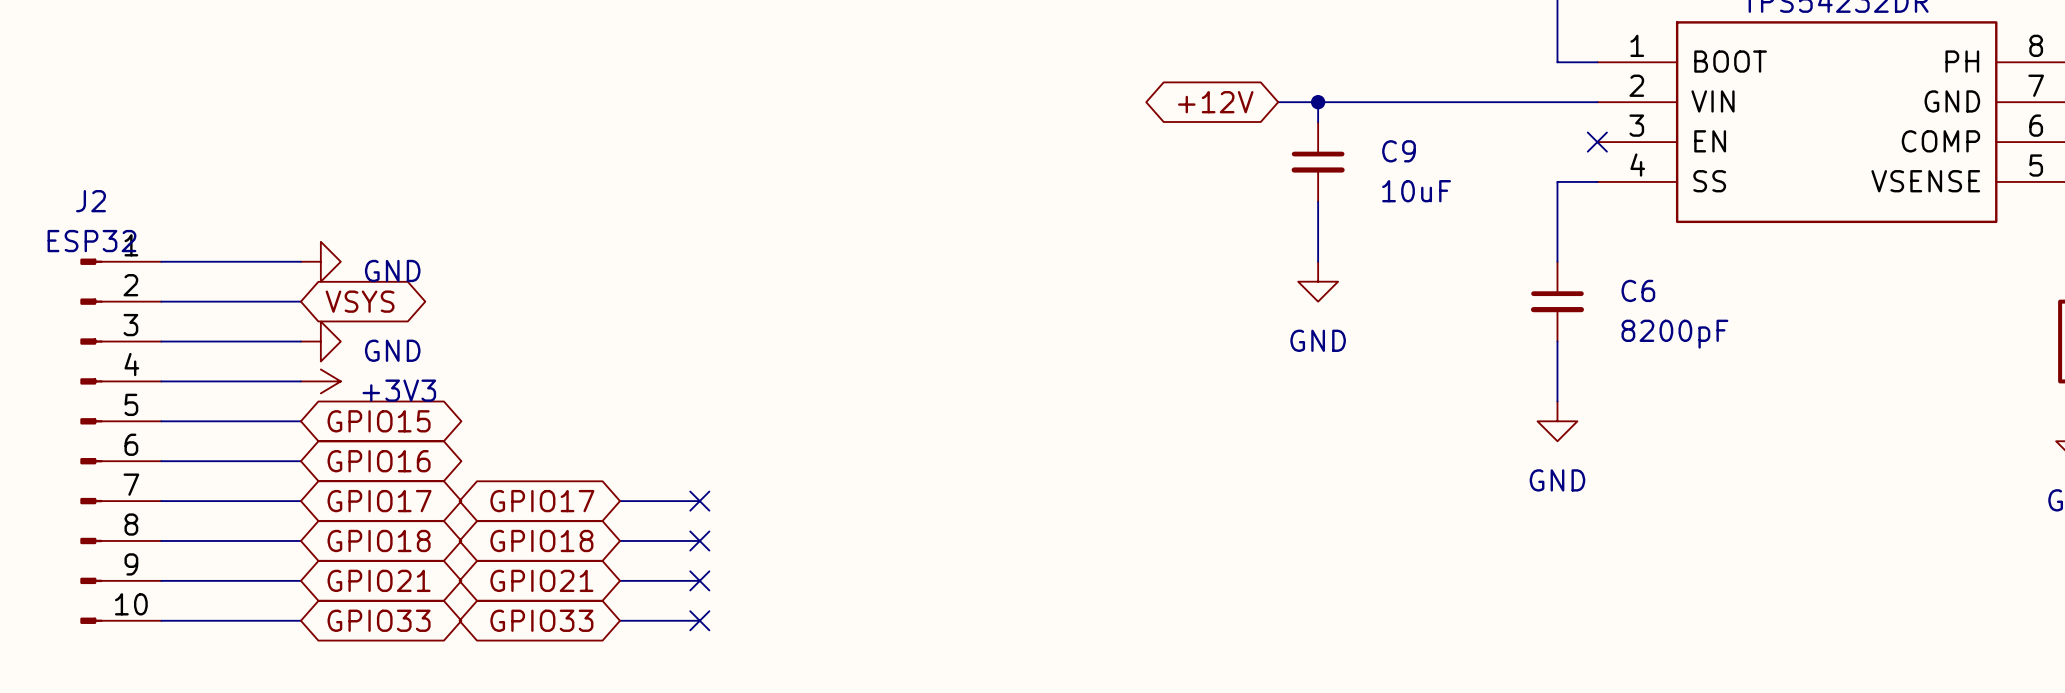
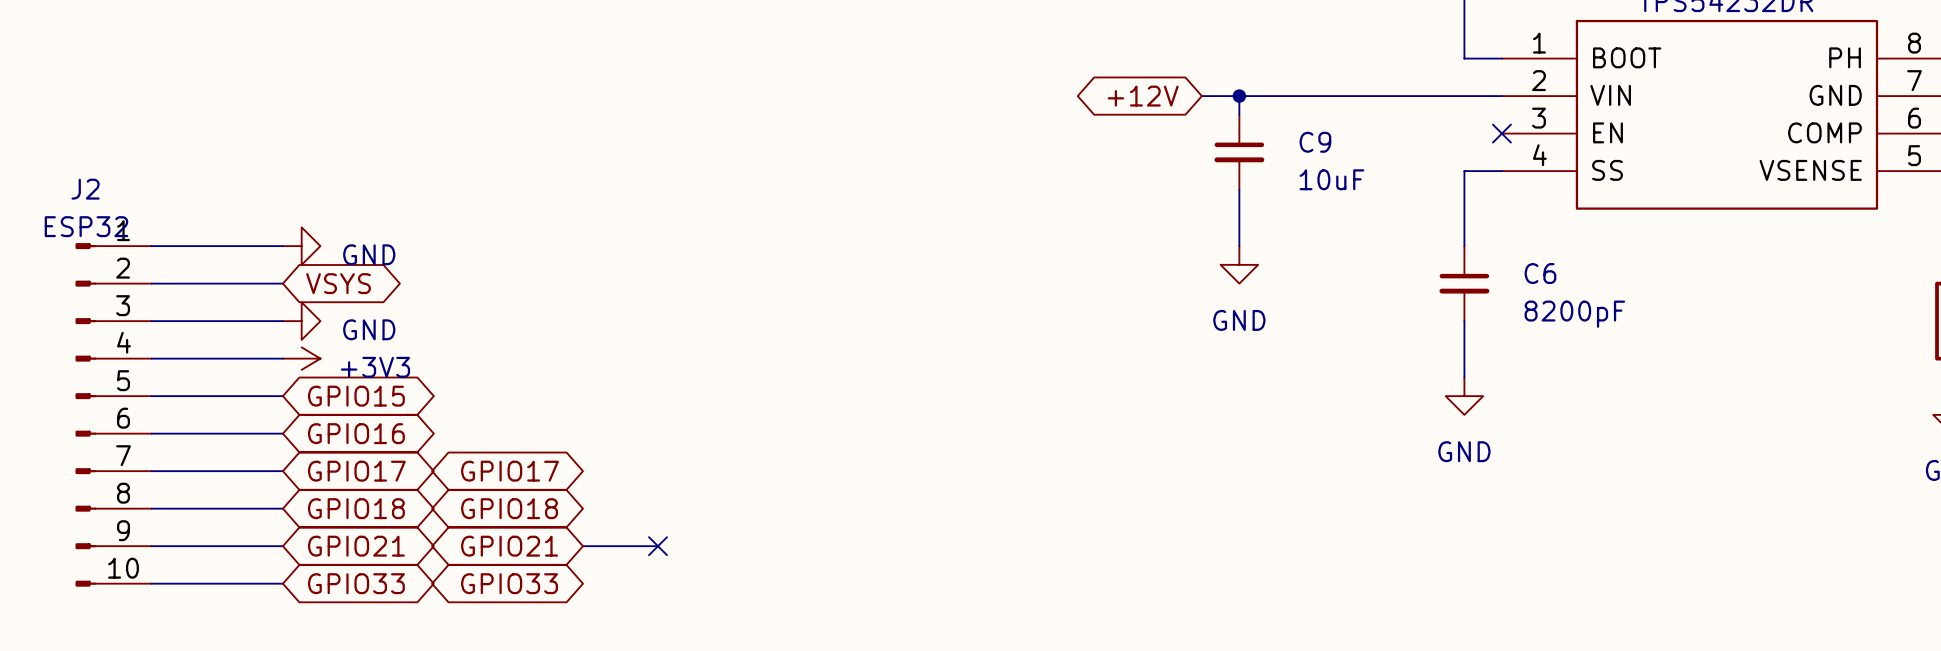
wire: (620, 501) (699, 501) -> none
no-connect mark: (699, 501) -> none
wire: (620, 540) (699, 540) -> none
no-connect mark: (699, 540) -> none
wire: (620, 620) (699, 620) -> none
no-connect mark: (699, 620) -> none

